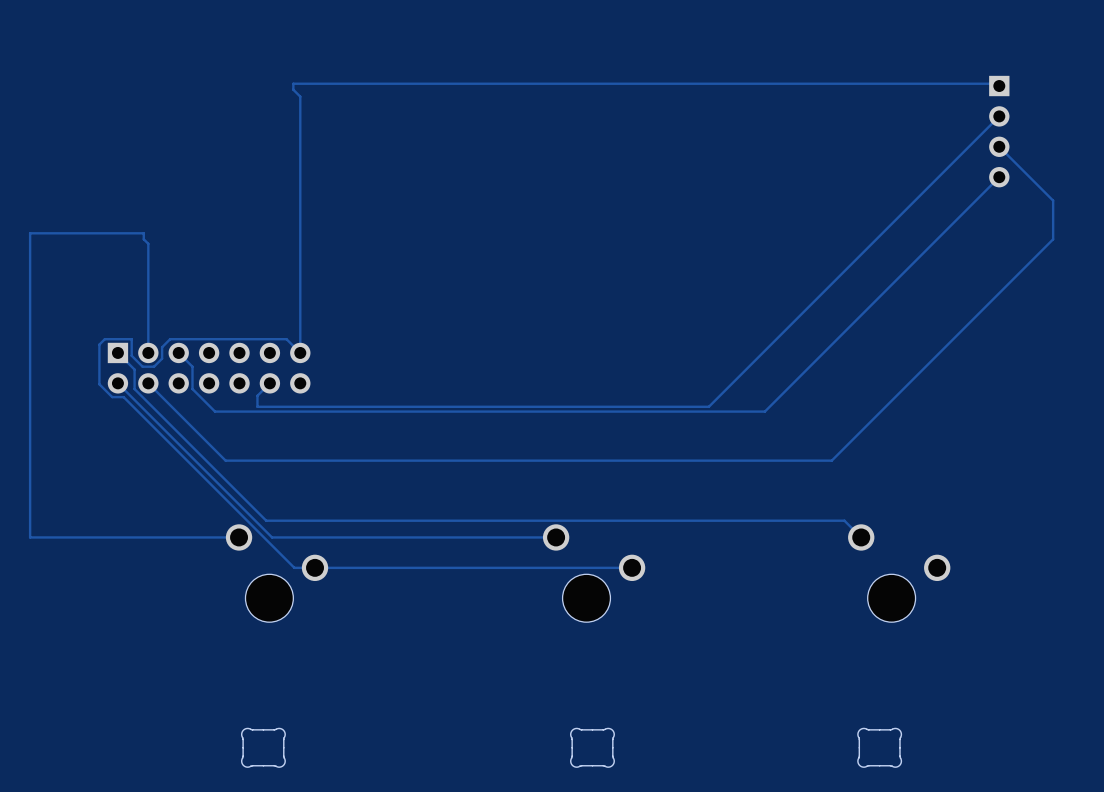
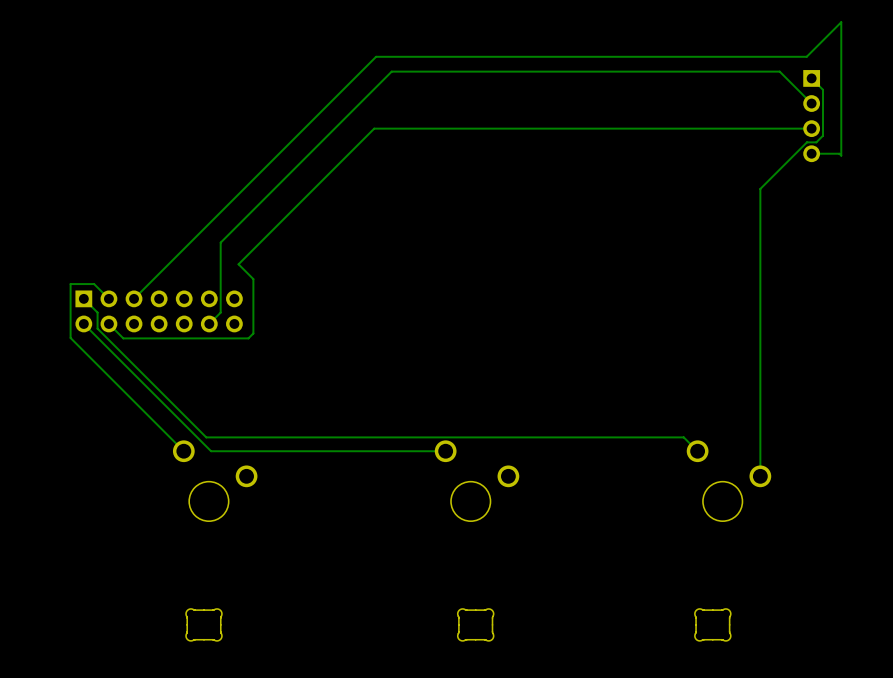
track: (999, 86) (997, 83) (293, 83) (293, 89) (300, 96) (300, 352) (286, 339) (170, 339) (162, 347) (162, 358) (154, 366) (142, 366) (131, 355) (131, 339) (104, 339) (99, 344) (99, 384) (112, 397) (123, 397) (294, 567) (632, 567) -> (811, 78) (823, 89) (823, 135) (816, 142) (806, 142) (760, 188) (760, 476)
track: (999, 116) (708, 406) (257, 406) (257, 395) (269, 383) -> (811, 103) (779, 71) (391, 71) (220, 242) (220, 312) (209, 323)
track: (999, 146) (1053, 200) (1053, 239) (831, 460) (225, 460) (165, 400) -> (811, 128) (374, 128) (238, 264) (253, 279) (253, 333) (248, 338) (123, 338)
track: (999, 177) (764, 411) (215, 411) (192, 389) (192, 366) (178, 352) -> (811, 153) (839, 153) (841, 155) (841, 22) (806, 56) (376, 56) (134, 298)
track: (148, 352) (148, 243) (143, 239) (143, 233) (30, 233) (30, 537) (239, 537) -> (108, 298) (94, 284) (70, 284) (70, 338) (183, 451)

